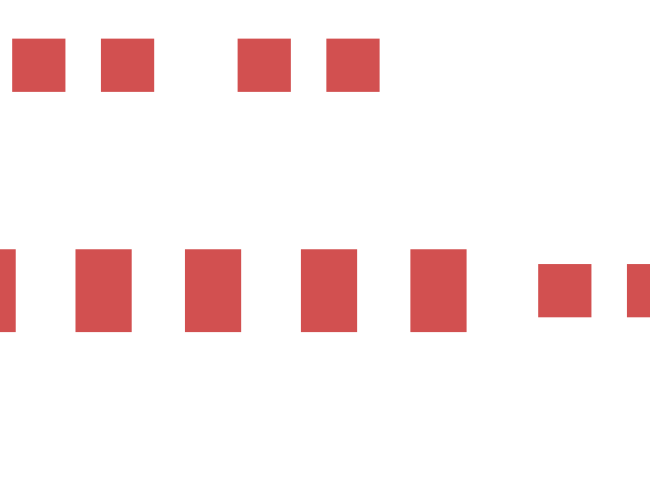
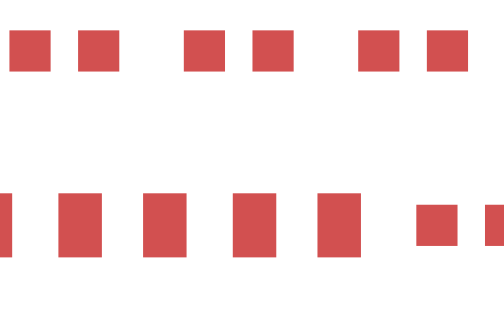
part: none -> (413, 50)

